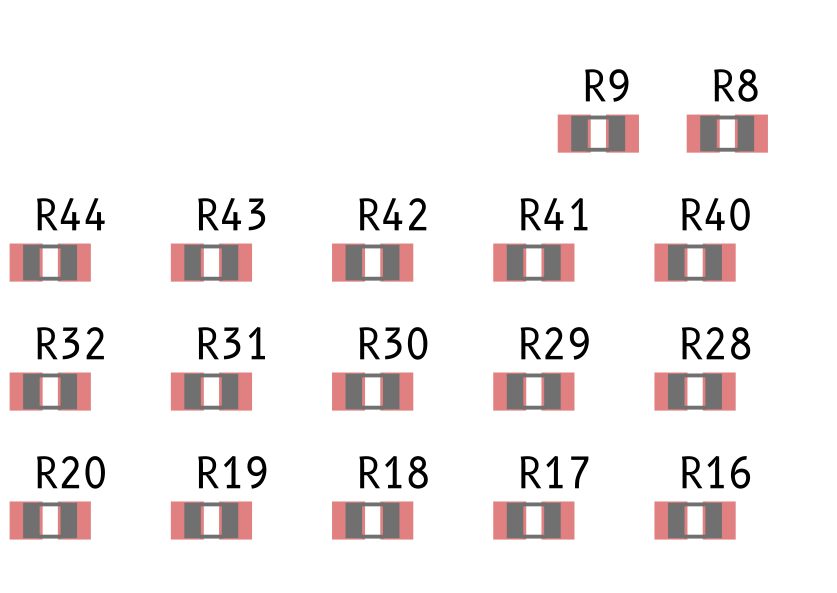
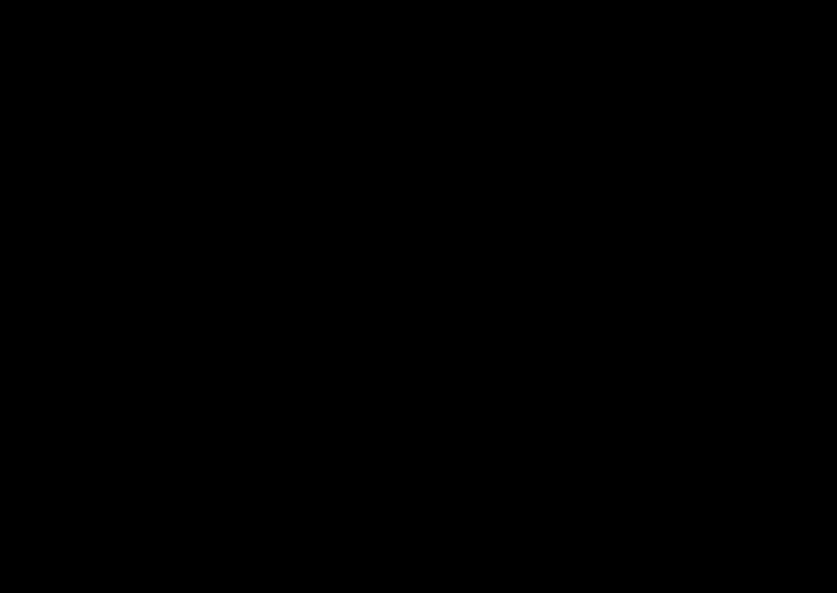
R9: (598, 133) -> none
R8: (727, 133) -> none
R44: (50, 262) -> none
R43: (211, 262) -> none
R42: (372, 262) -> none
R41: (533, 262) -> none
R40: (695, 262) -> none
R32: (50, 391) -> none
R31: (211, 391) -> none
R30: (372, 391) -> none
R29: (533, 391) -> none
R28: (695, 391) -> none
R20: (50, 520) -> none
R19: (211, 520) -> none
R18: (372, 520) -> none
R17: (533, 520) -> none
R16: (695, 520) -> none

